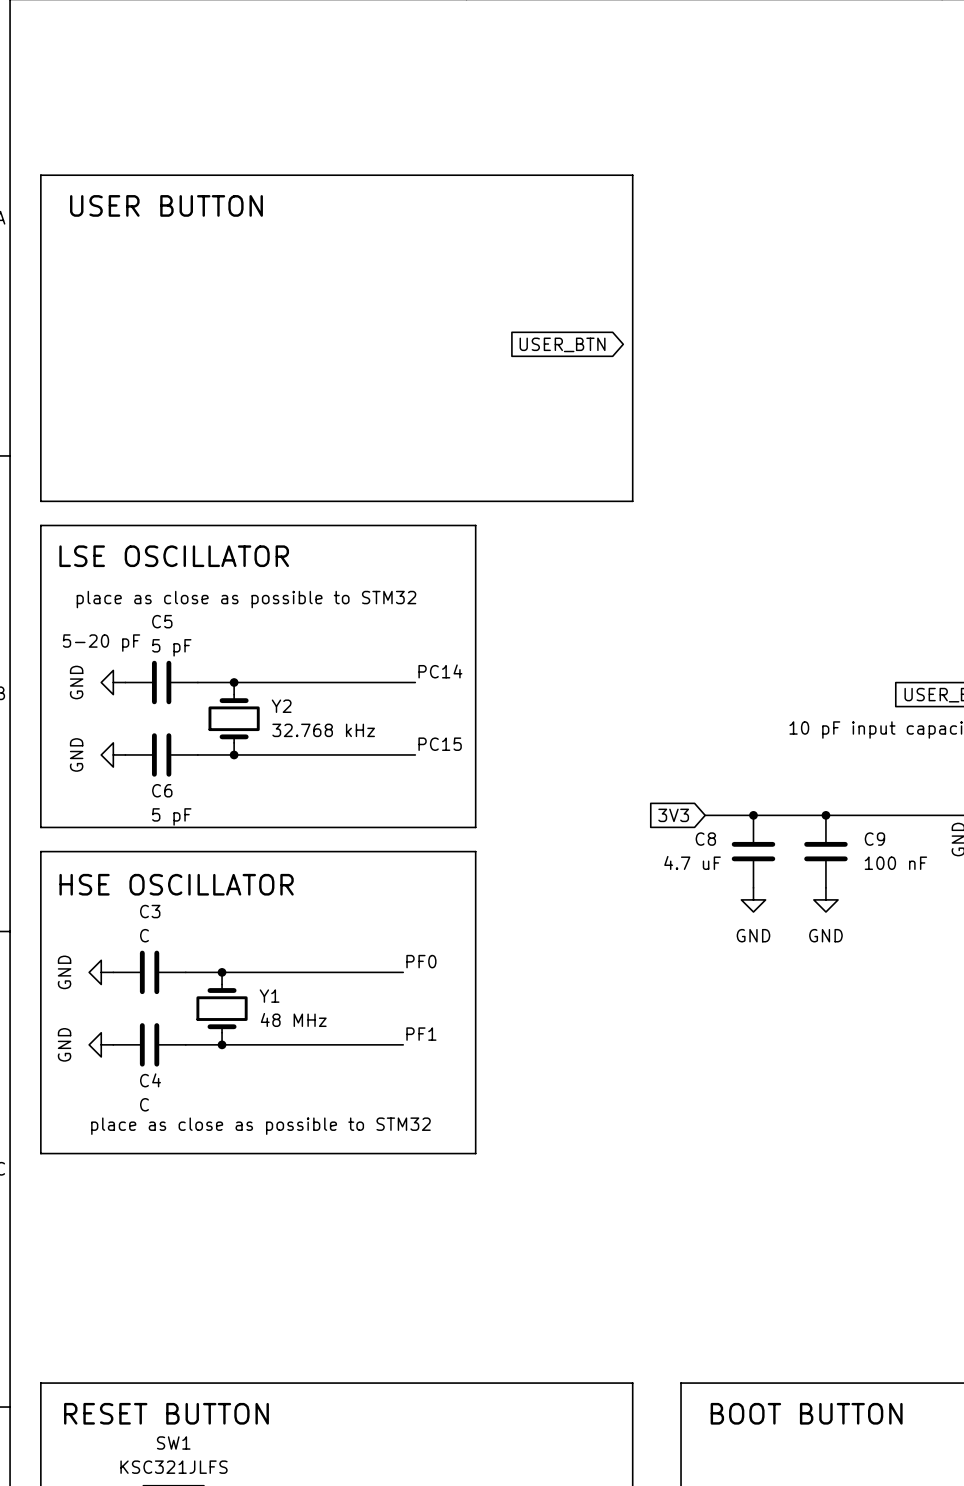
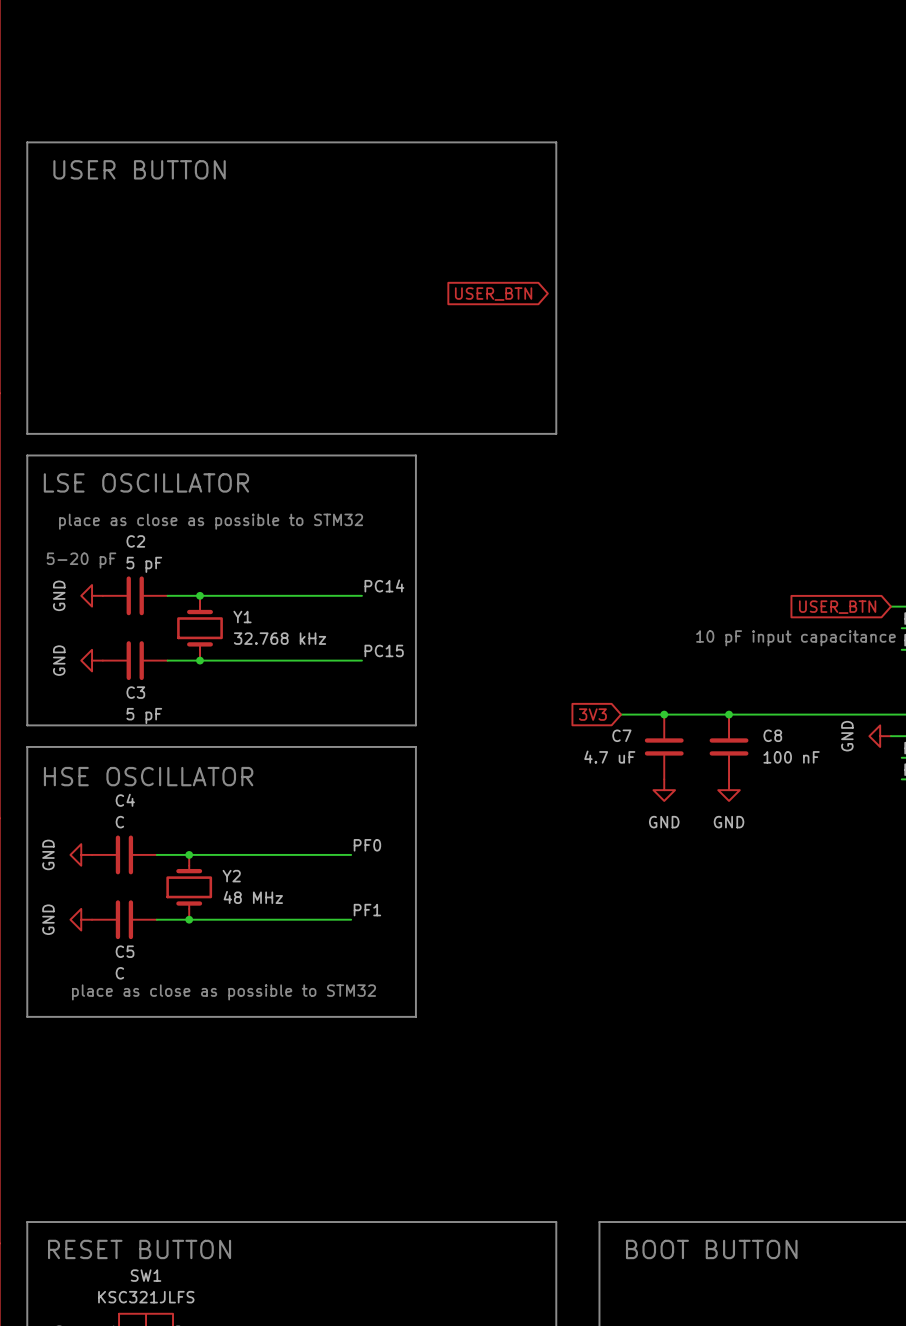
C5 name: C5 (162, 621) -> C2 (135, 541)
Y2 name: Y2 (281, 706) -> Y1 (242, 617)
C6 name: C6 (162, 790) -> C3 (135, 692)
C8 name: C8 (705, 839) -> C7 (621, 735)
C9 name: C9 (874, 839) -> C8 (772, 735)
C3 name: C3 (150, 911) -> C4 (125, 800)
Y1 name: Y1 (269, 996) -> Y2 (231, 876)
C4 name: C4 (150, 1080) -> C5 (125, 951)

